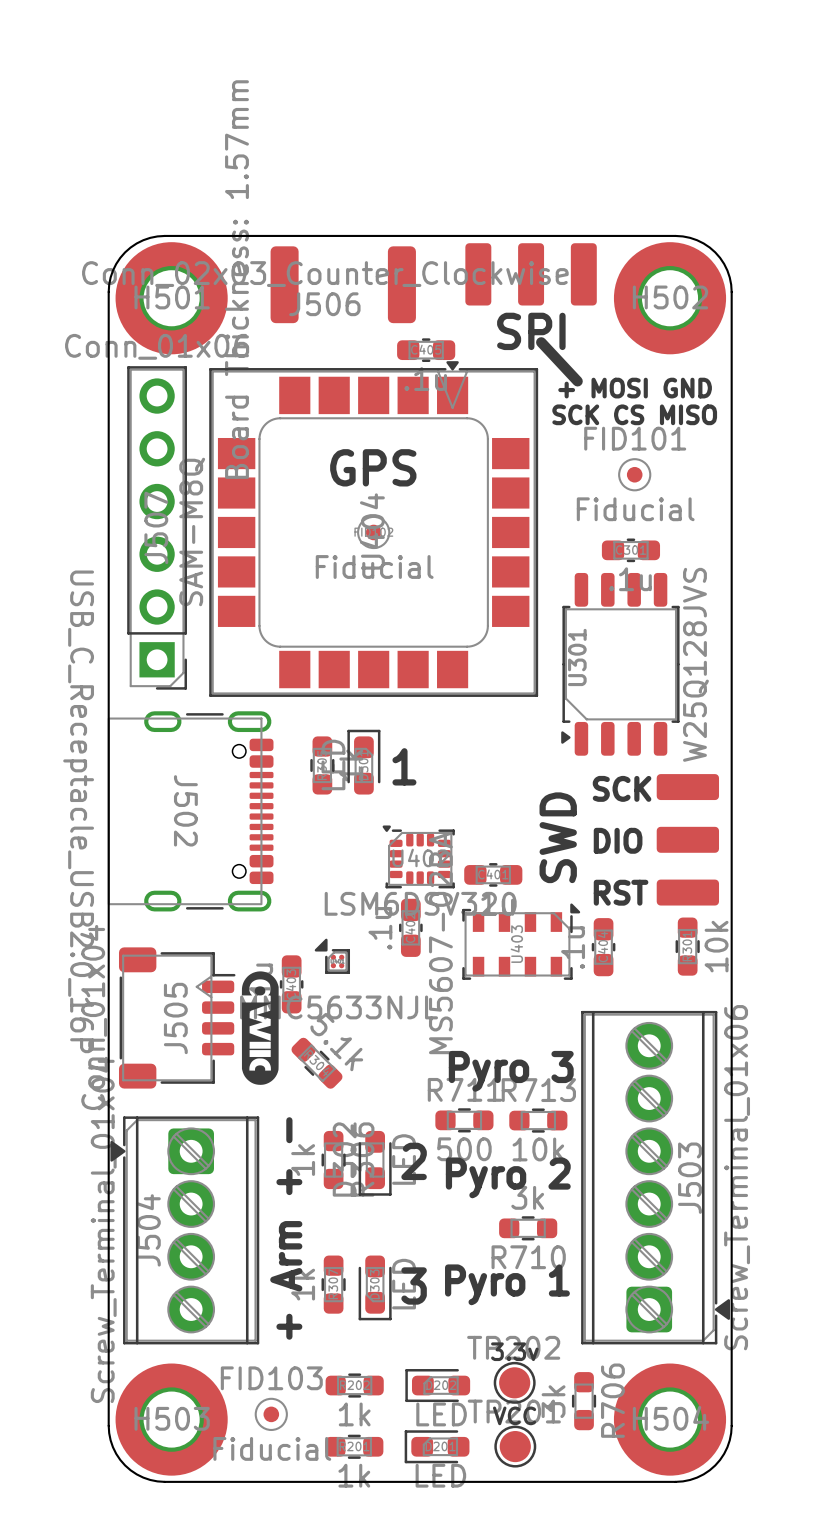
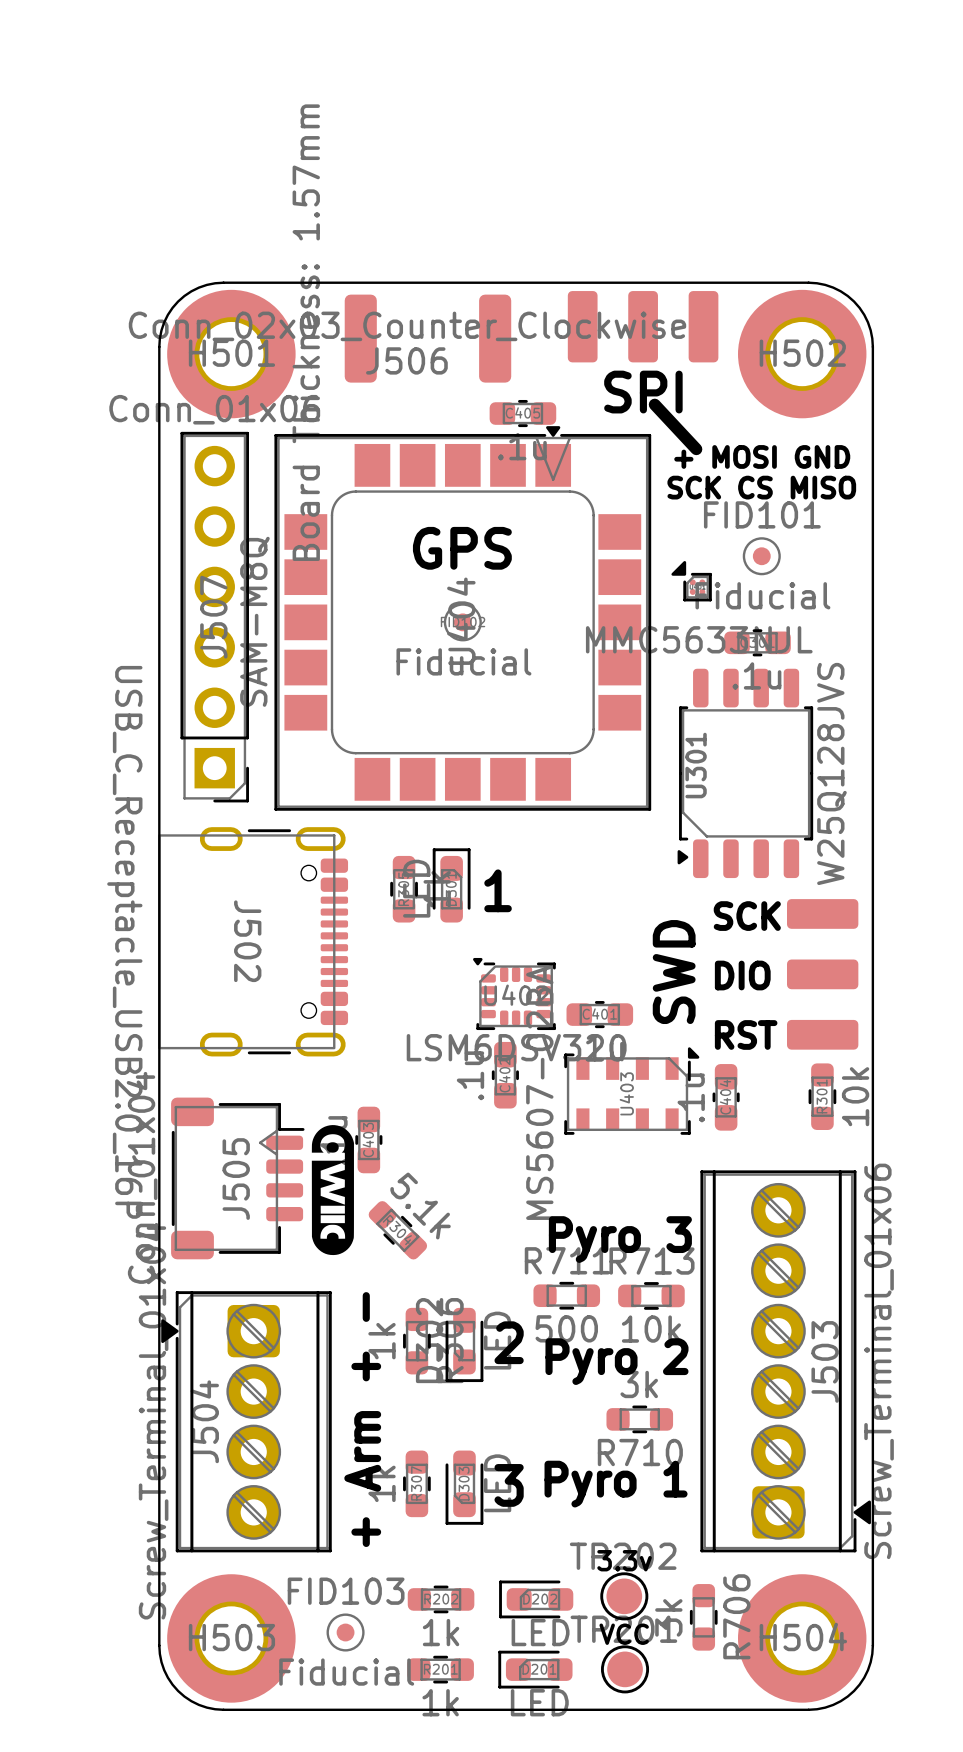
part position: (332, 956) -> (691, 581)

